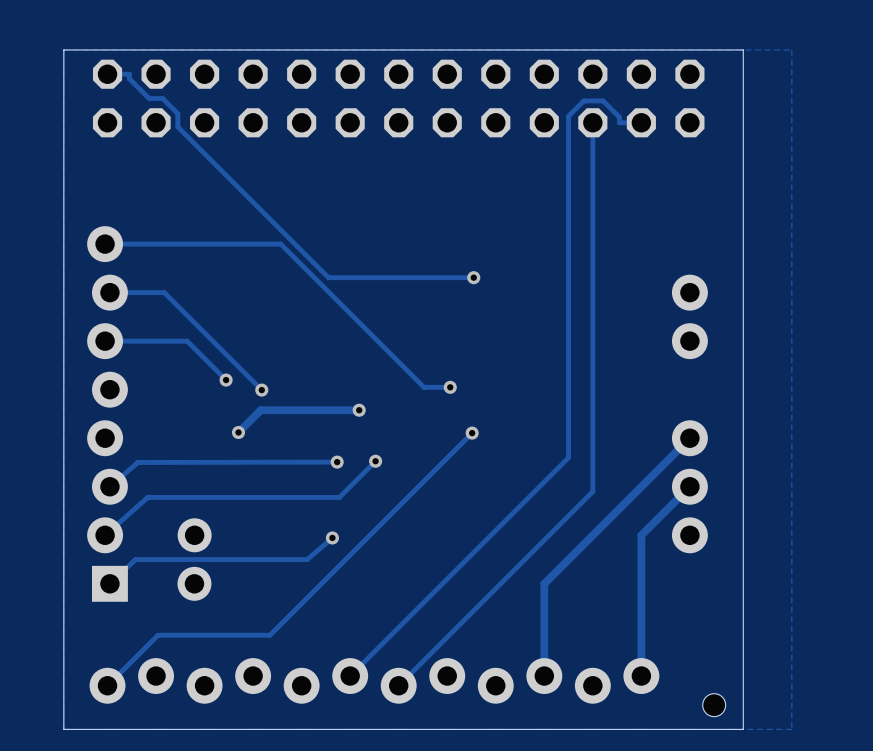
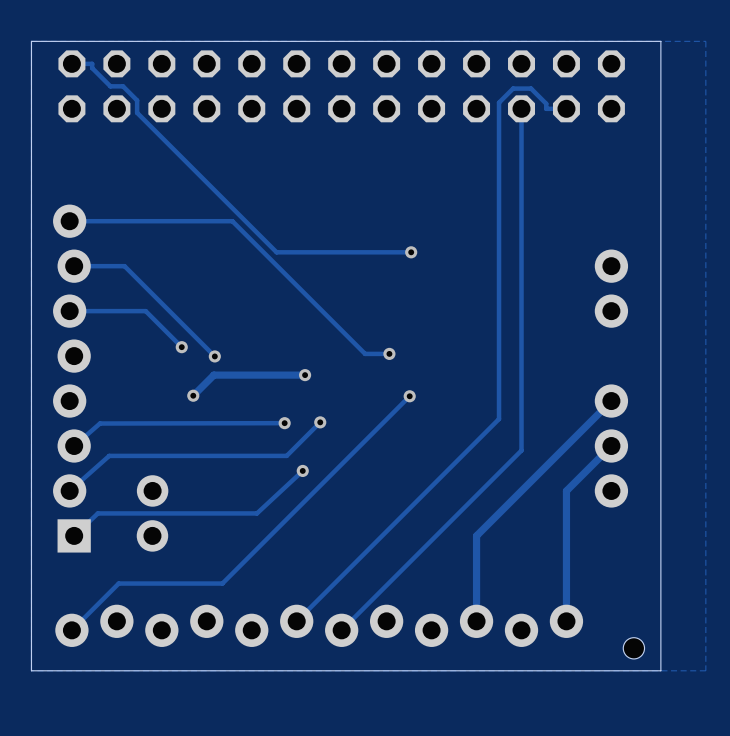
track: (332, 537) (307, 559) -> (302, 470) (256, 513)
via position: (332, 537) -> (302, 470)

